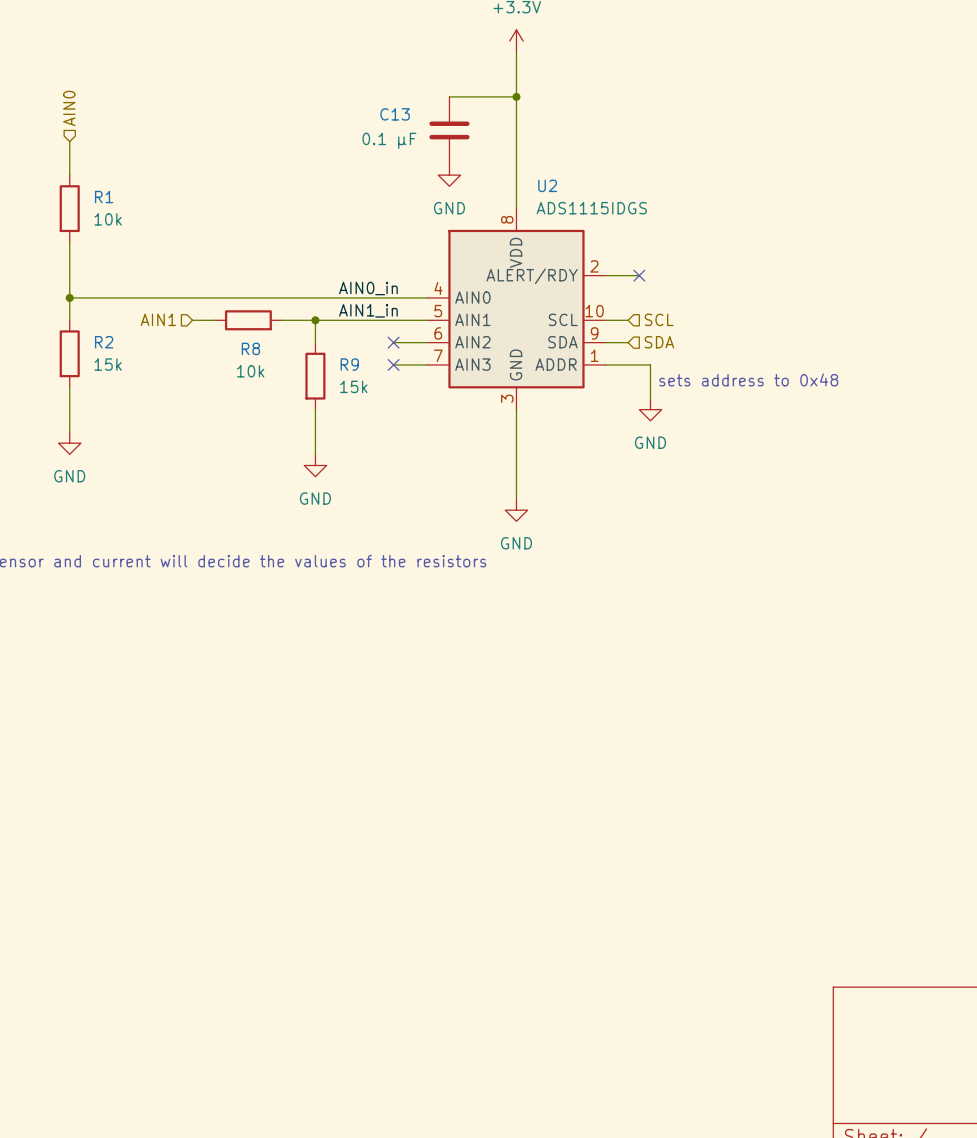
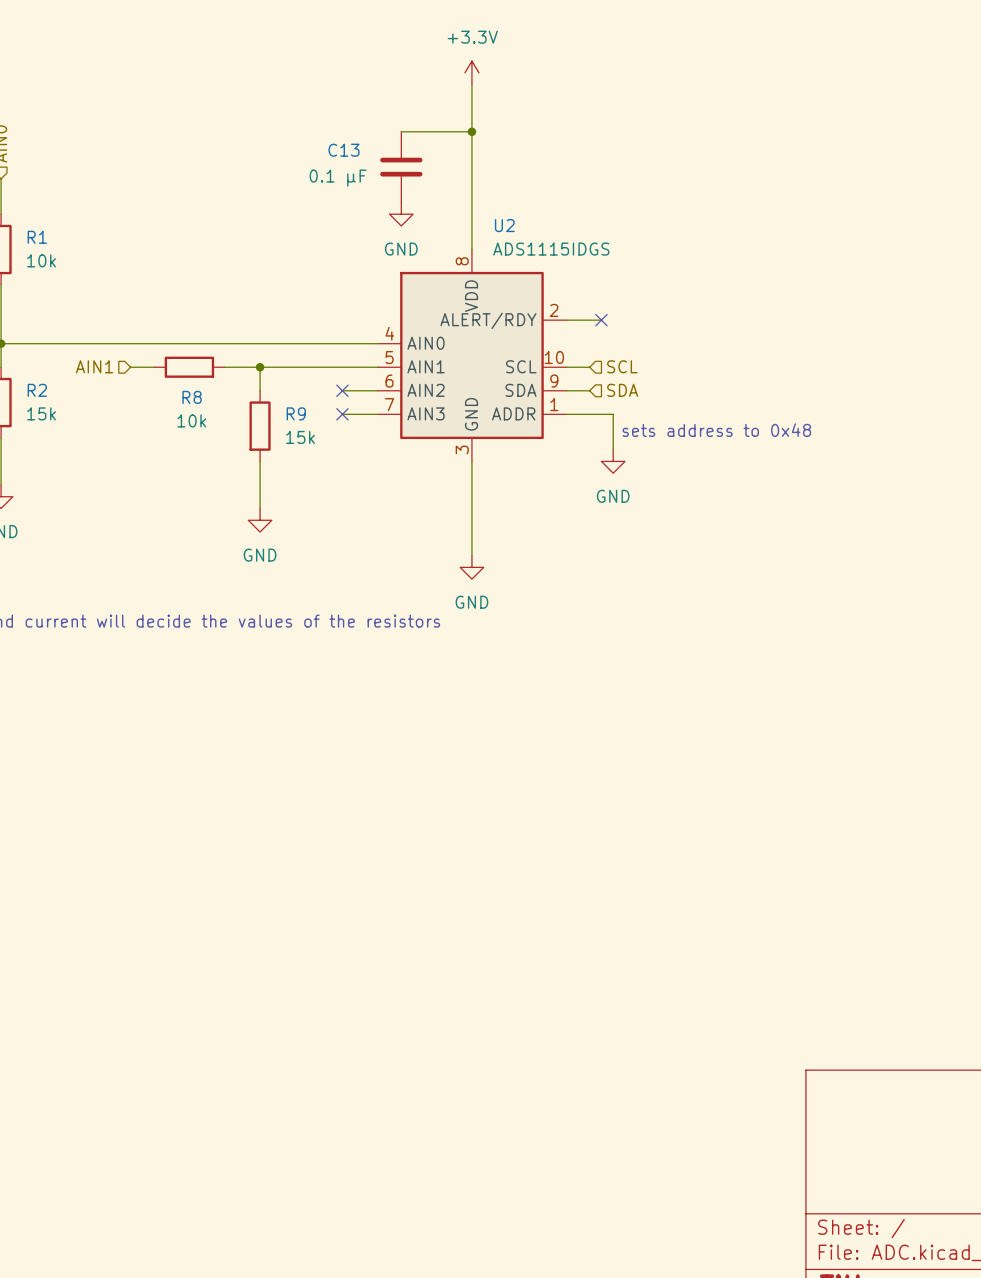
label: AIN0_in (368, 288) -> none
label: AIN1_in (368, 310) -> none

